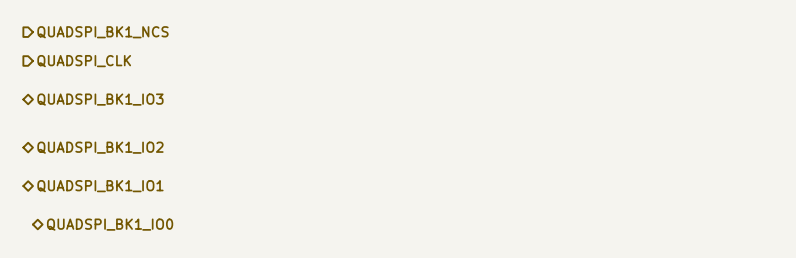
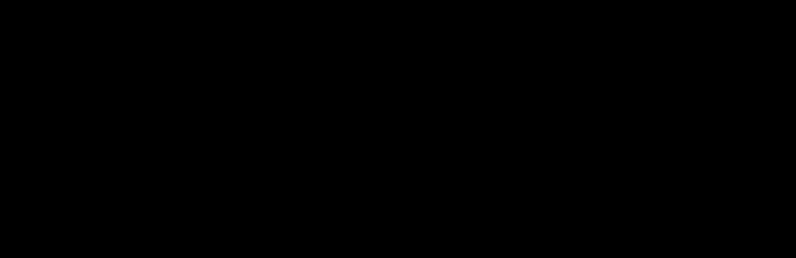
hierarchical label: QUADSPI_BK1_NCS (102, 32) -> none
hierarchical label: QUADSPI_CLK (84, 61) -> none
hierarchical label: QUADSPI_BK1_IO3 (100, 99) -> none
hierarchical label: QUADSPI_BK1_IO2 (100, 147) -> none
hierarchical label: QUADSPI_BK1_IO1 (100, 186) -> none
hierarchical label: QUADSPI_BK1_IO0 (110, 224) -> none

